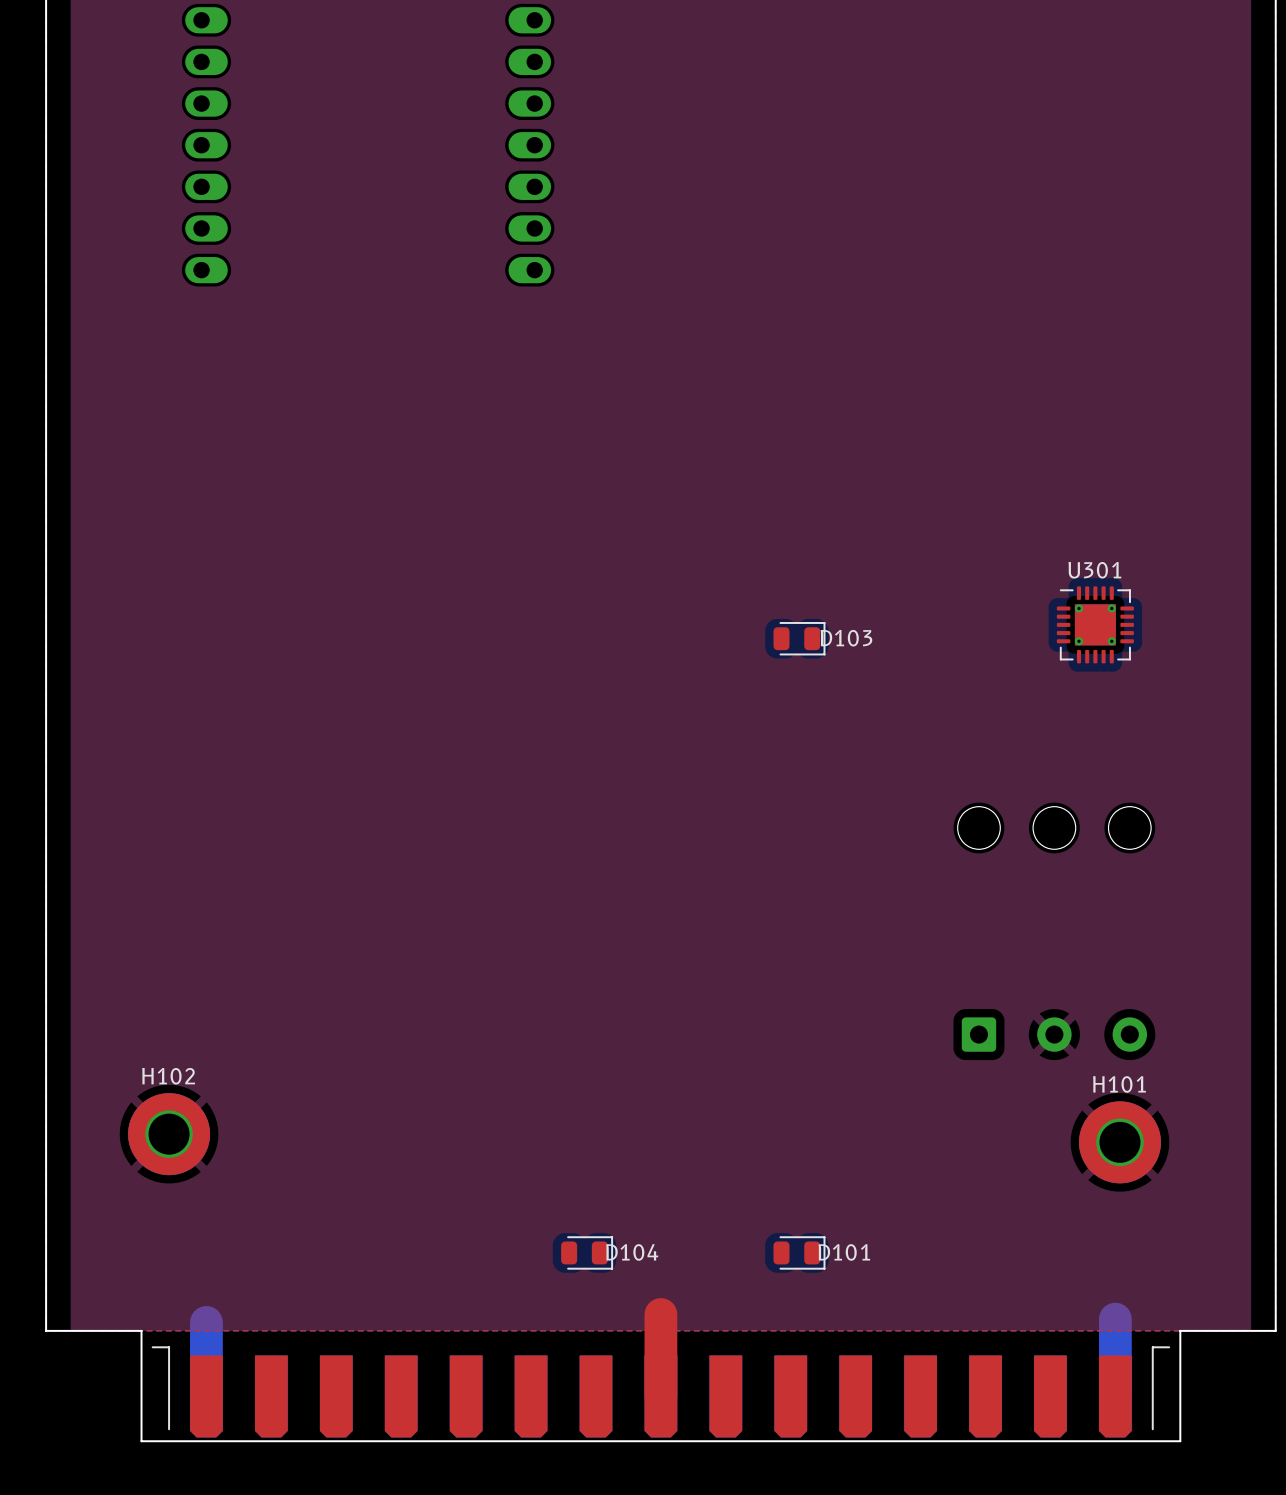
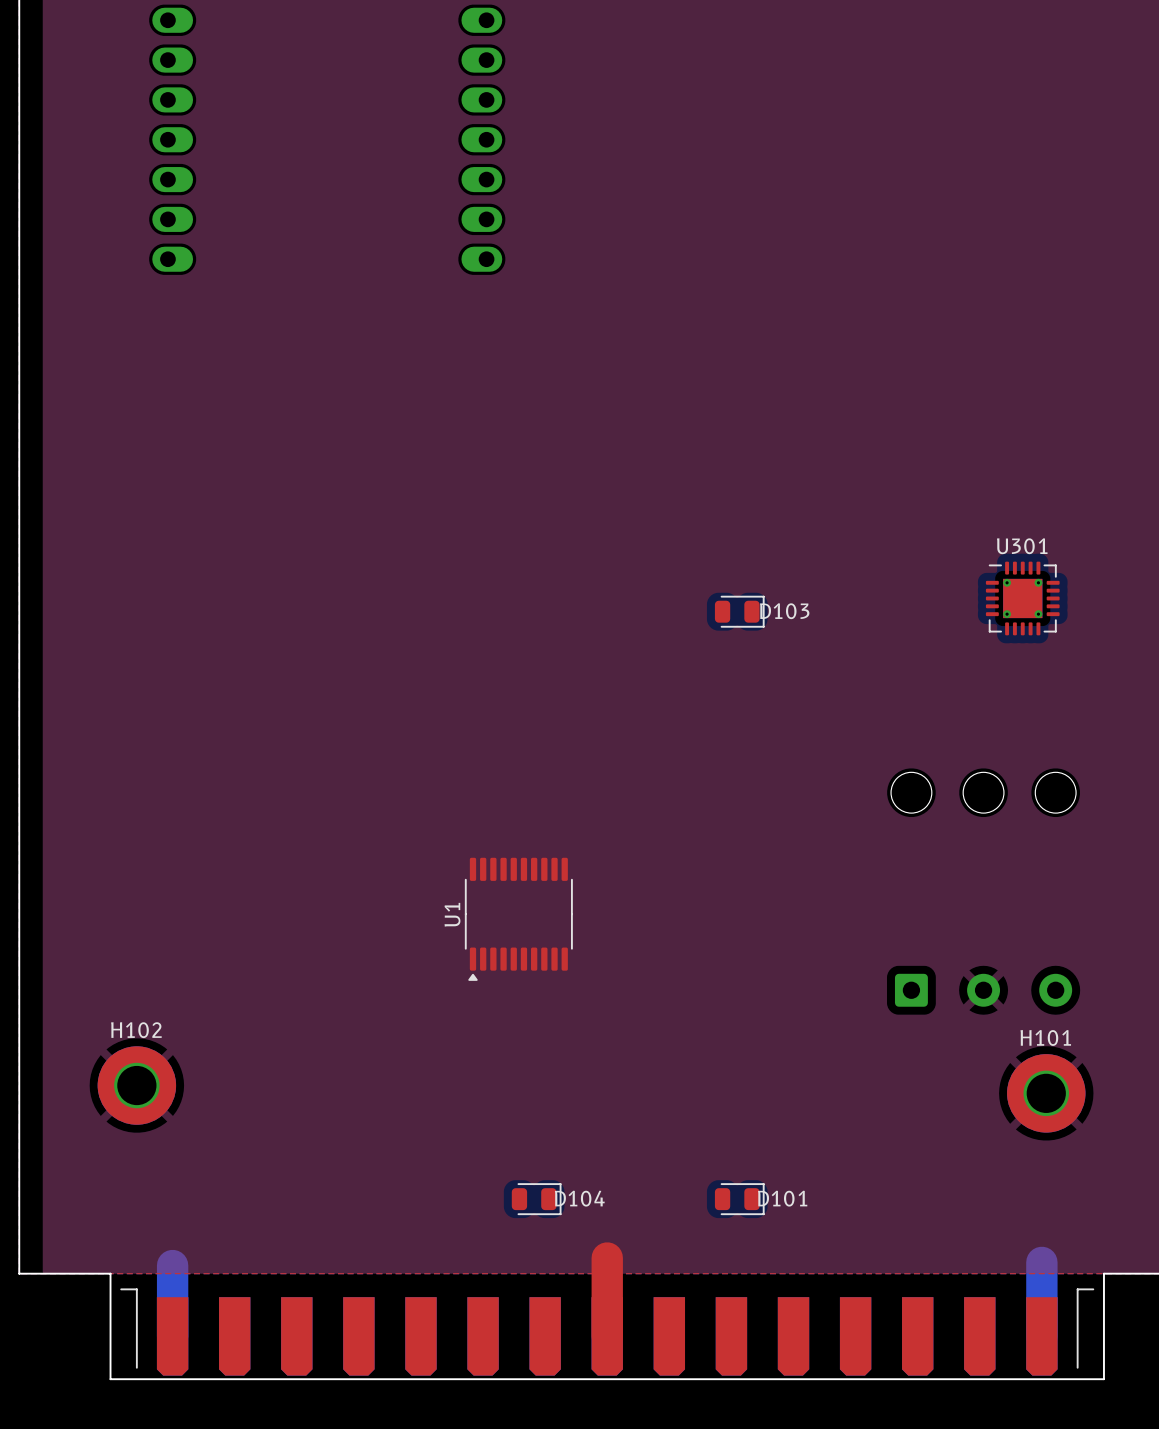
U1: none -> (518, 919)

